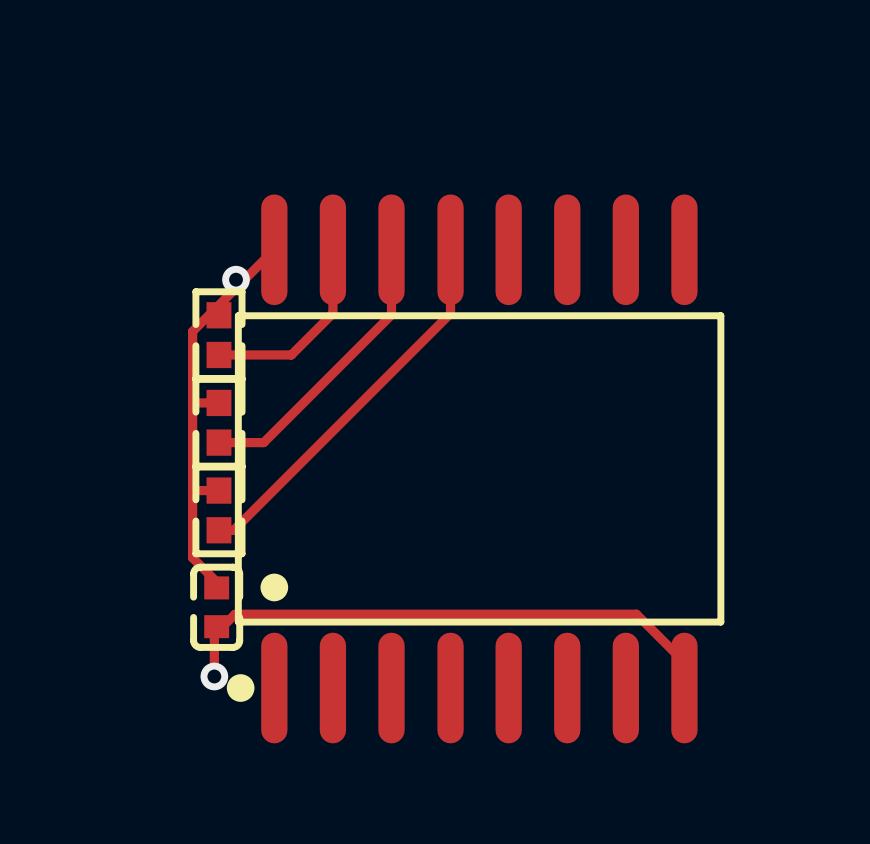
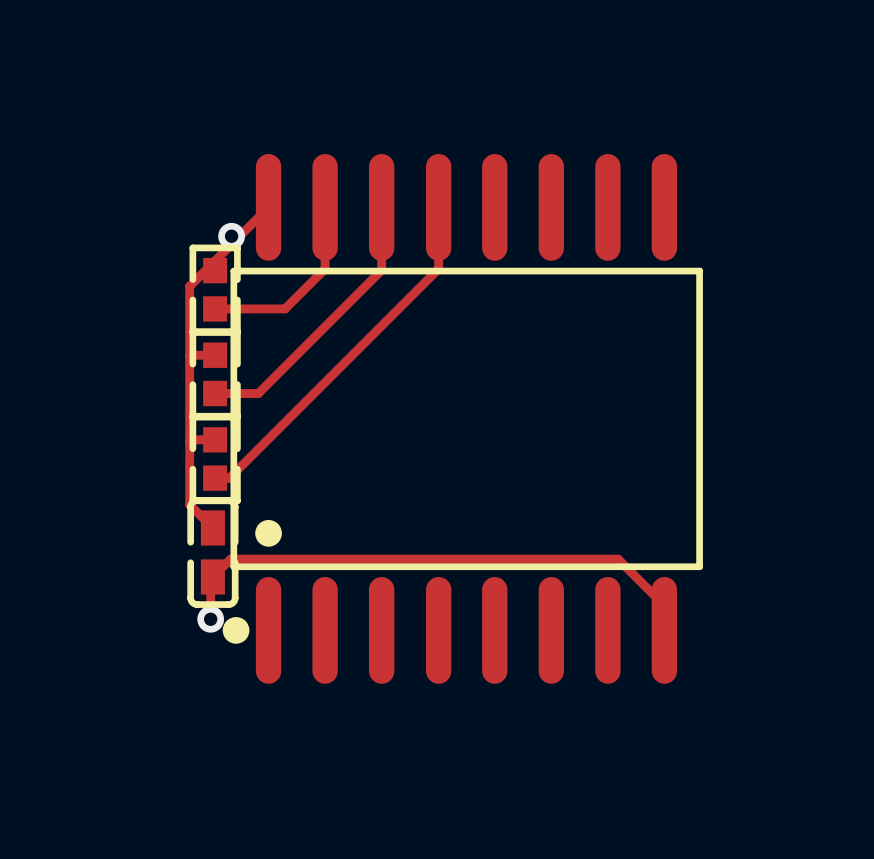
part footprint: [190, 563, 244, 651] -> [187, 497, 239, 608]

